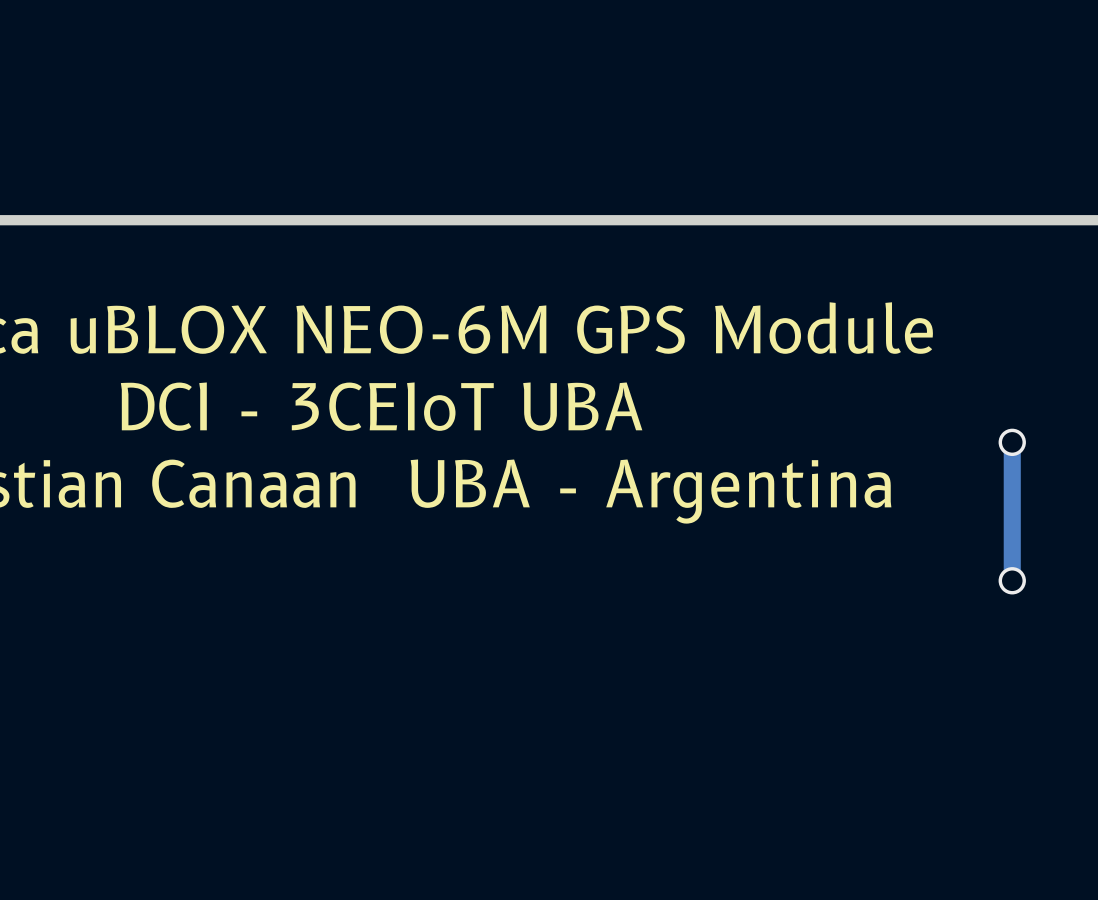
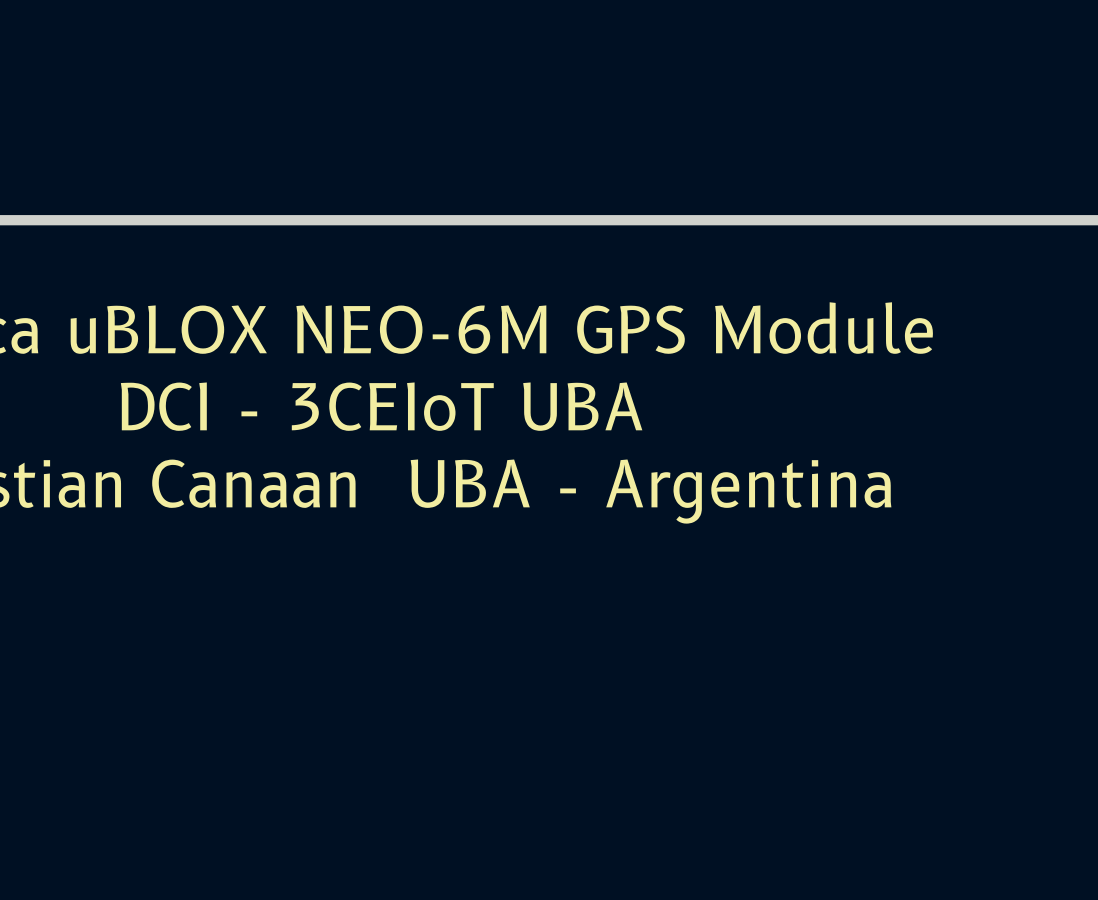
track: (1012, 442) (1012, 580) -> none
via: (1012, 442) -> none
via: (1012, 580) -> none

